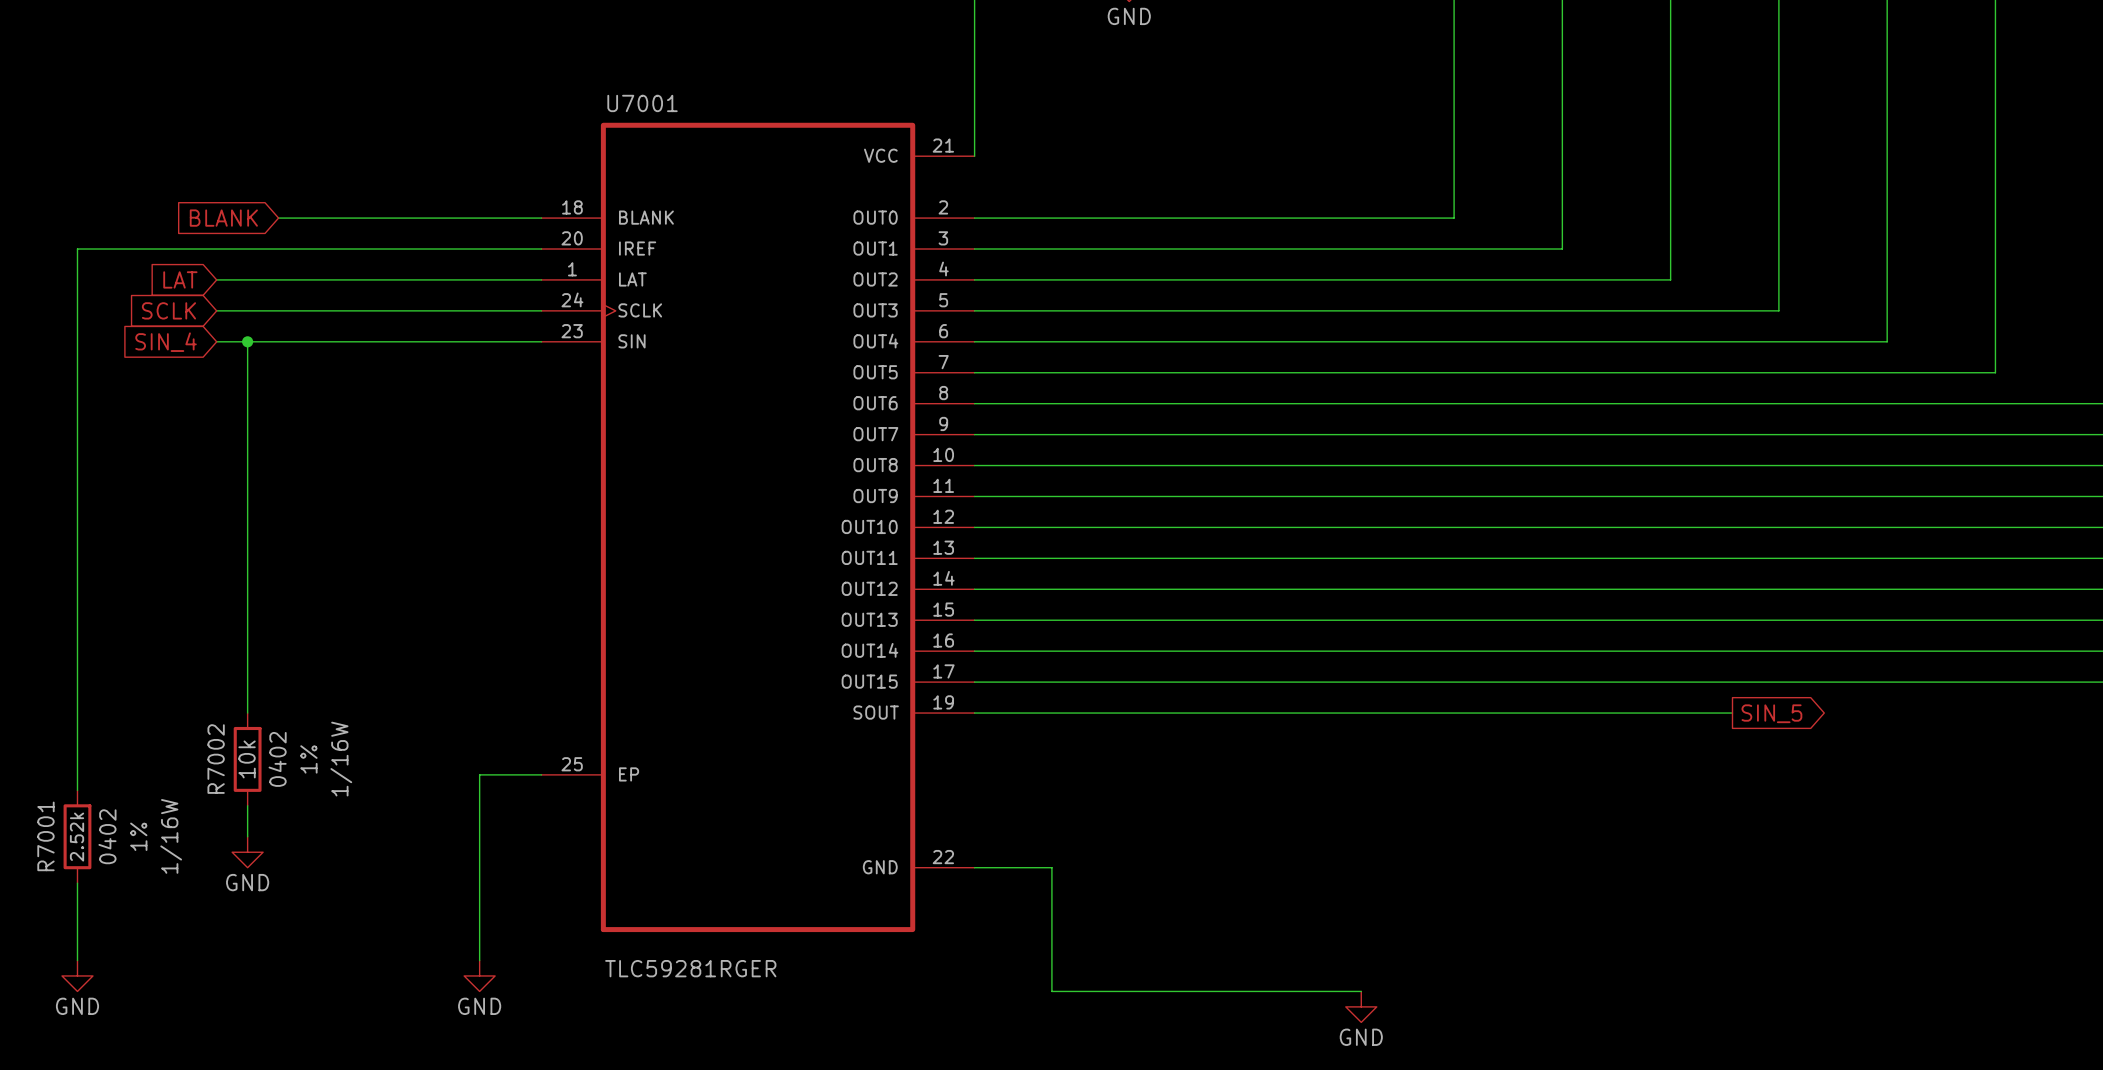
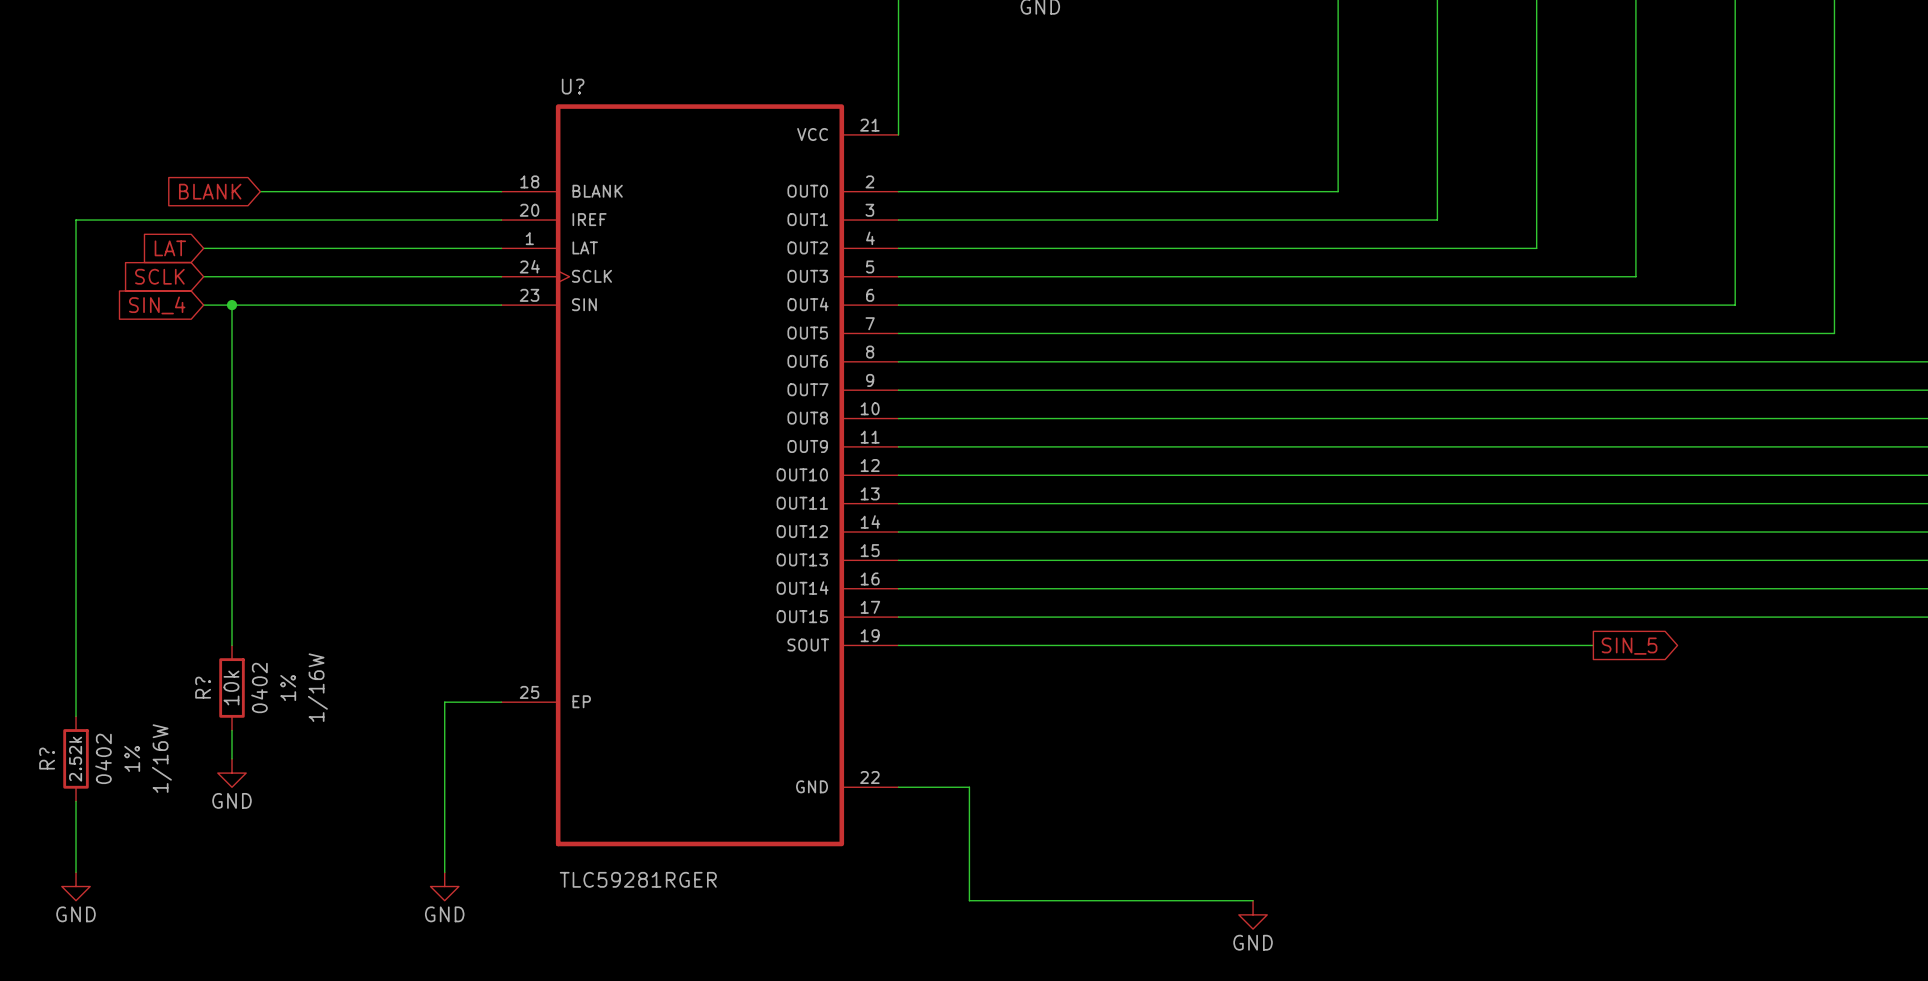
U7001 name: U7001 (642, 103) -> U? (573, 86)
R7002 name: R7002 (216, 759) -> R? (203, 687)
R7001 name: R7001 (45, 836) -> R? (47, 758)

